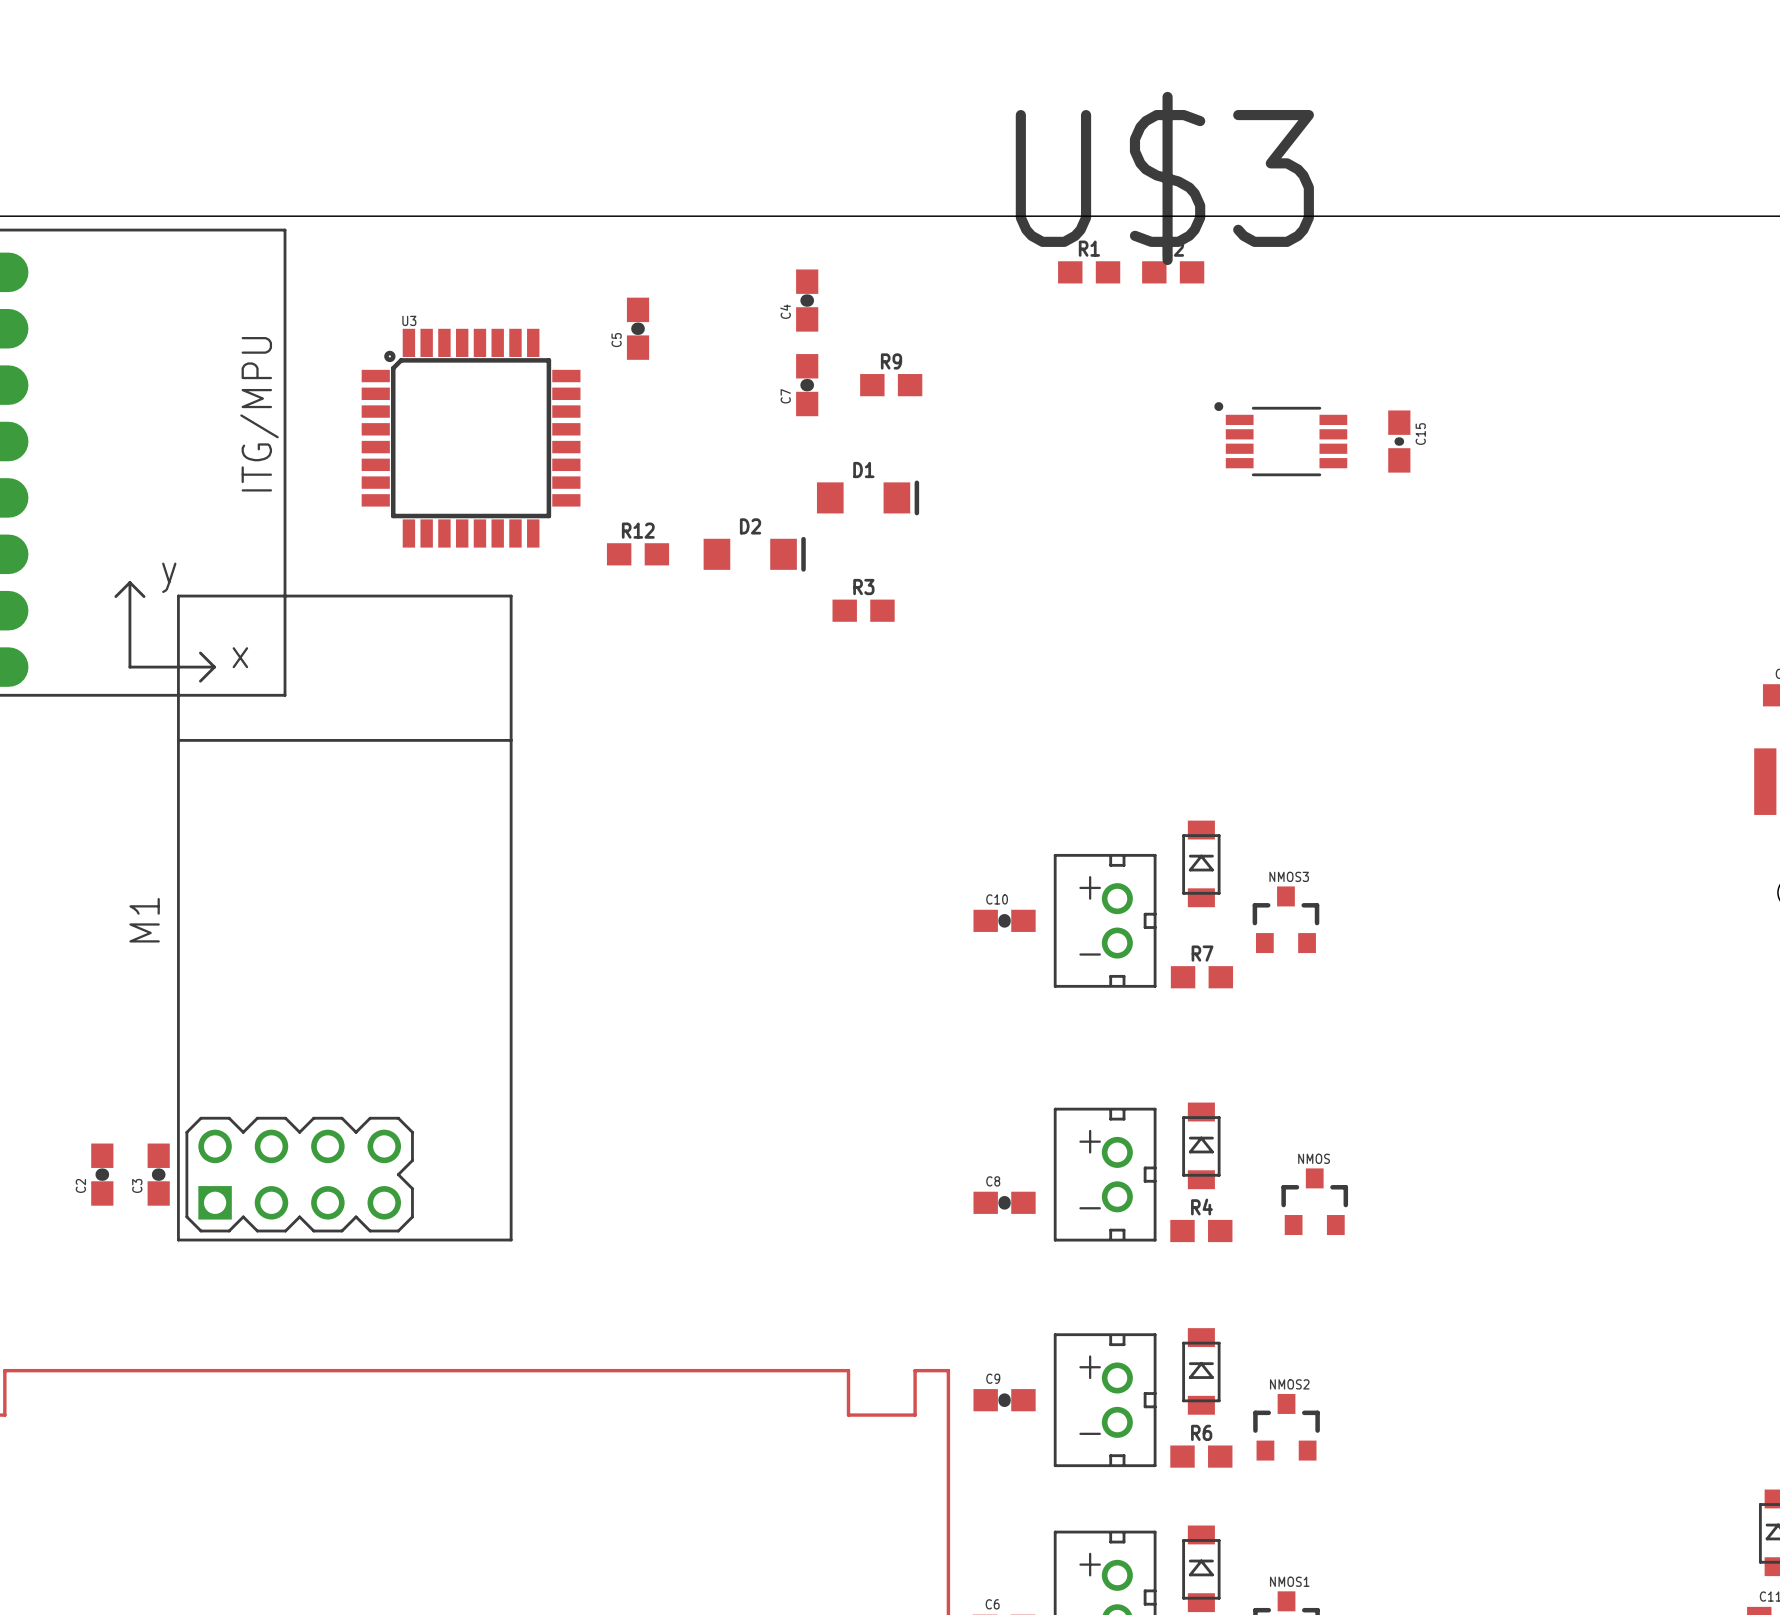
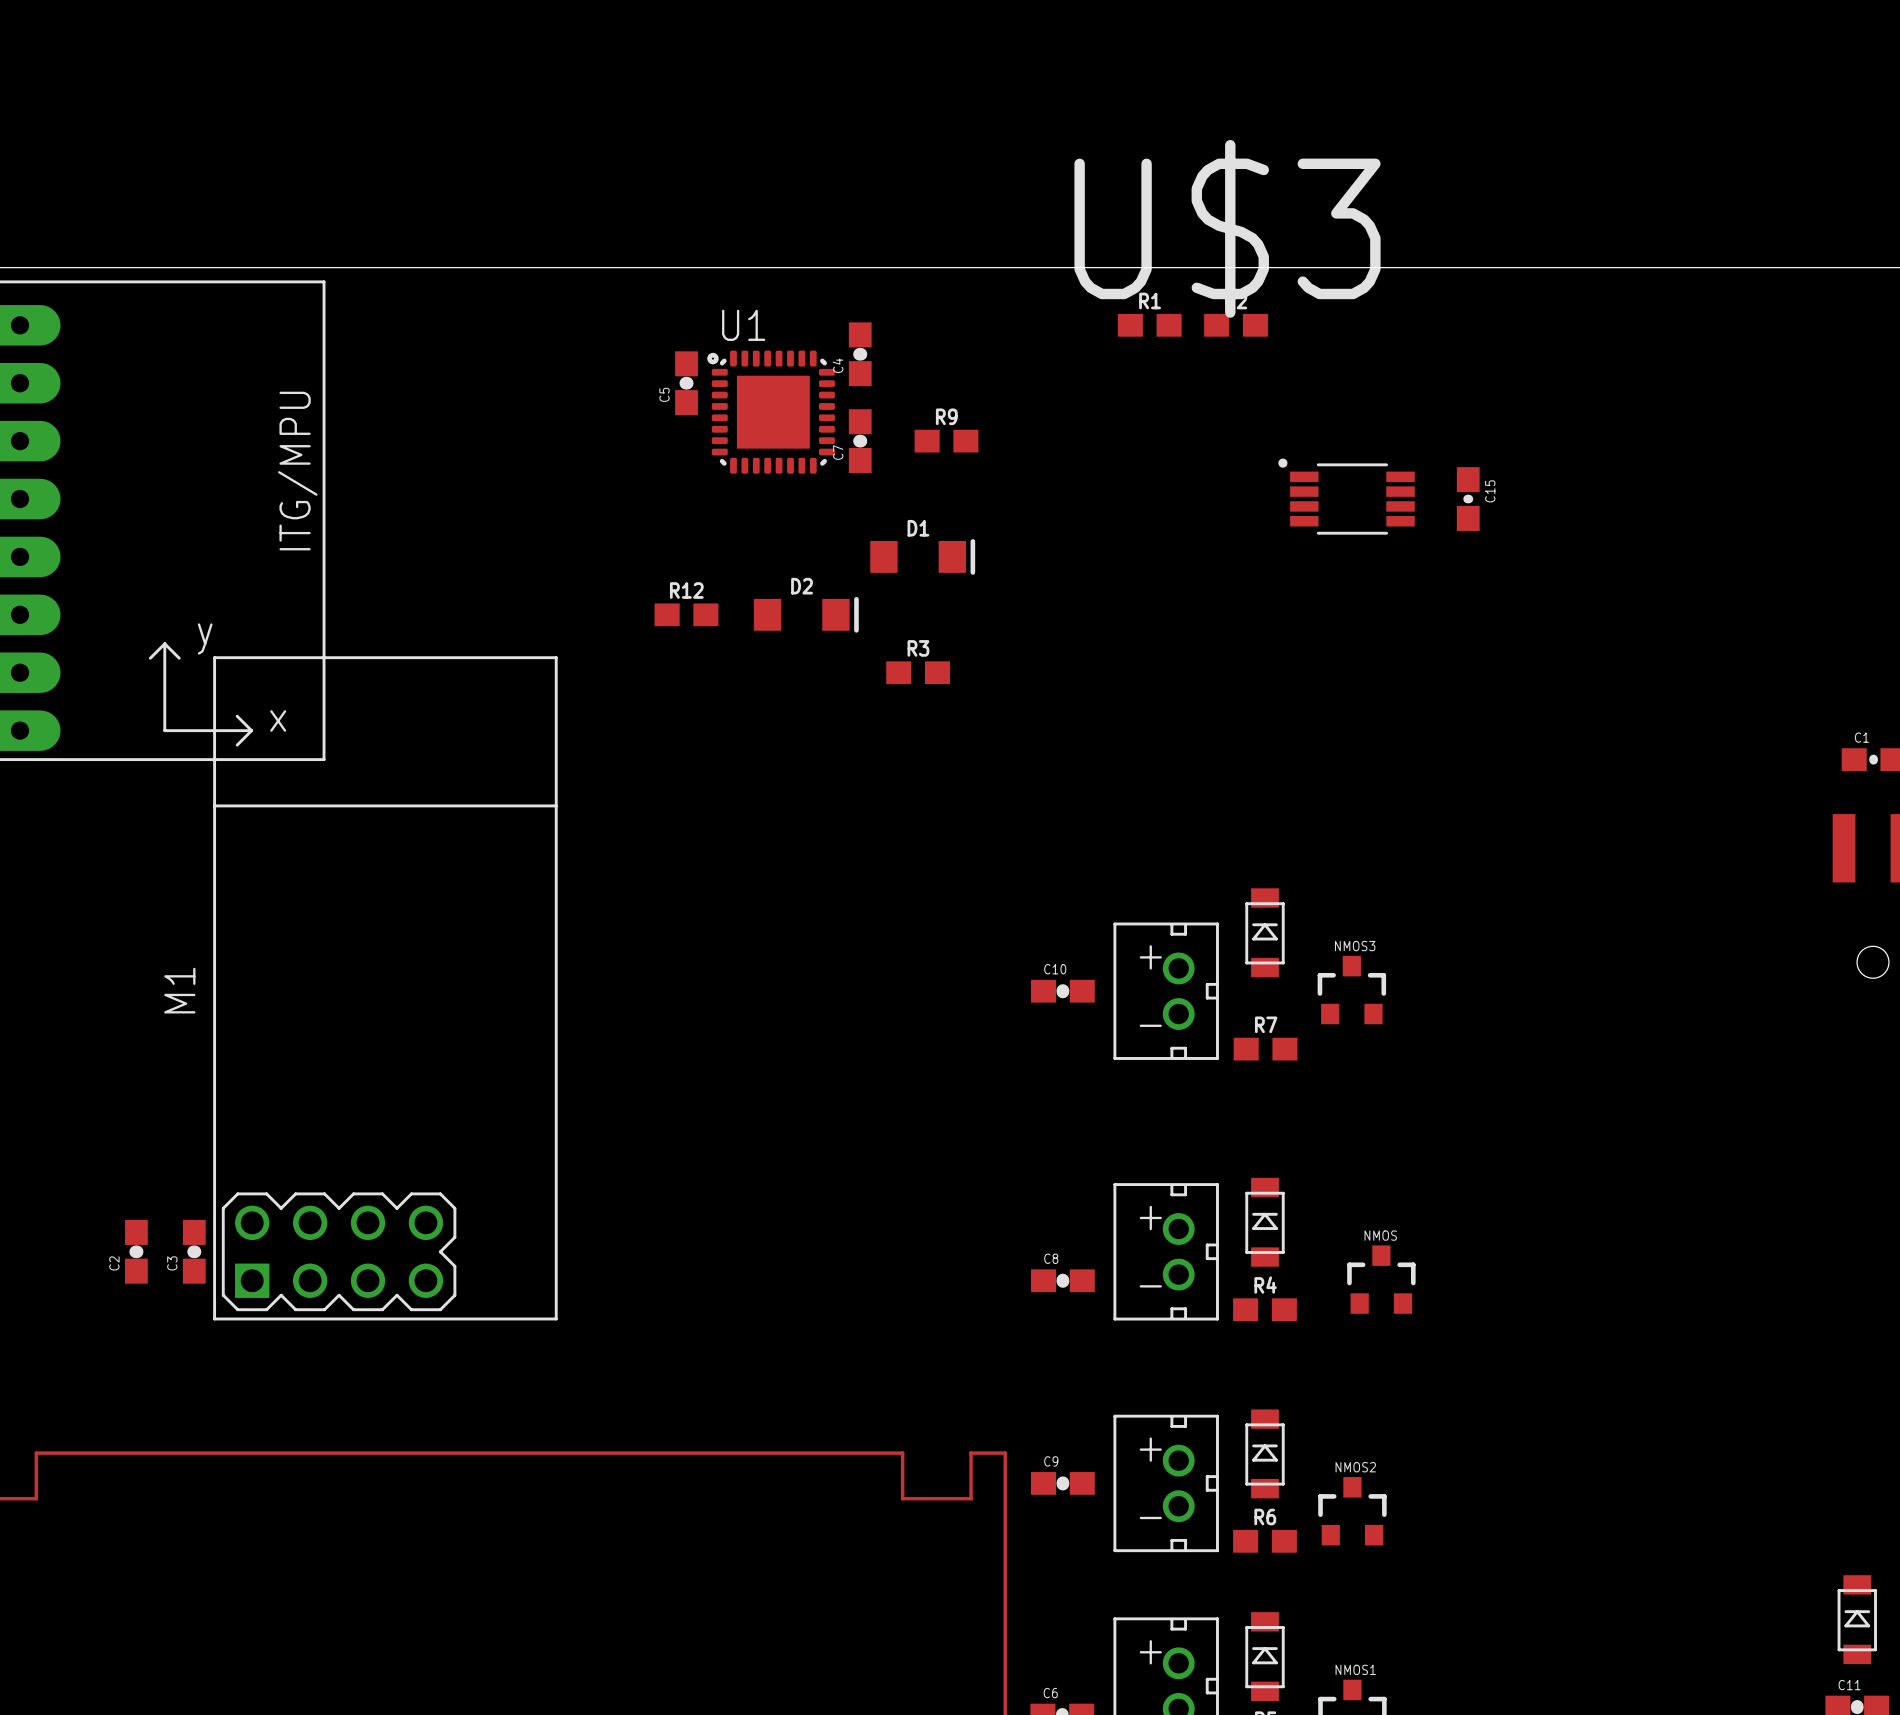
U1: none -> (771, 412)
U3: (471, 438) -> none

